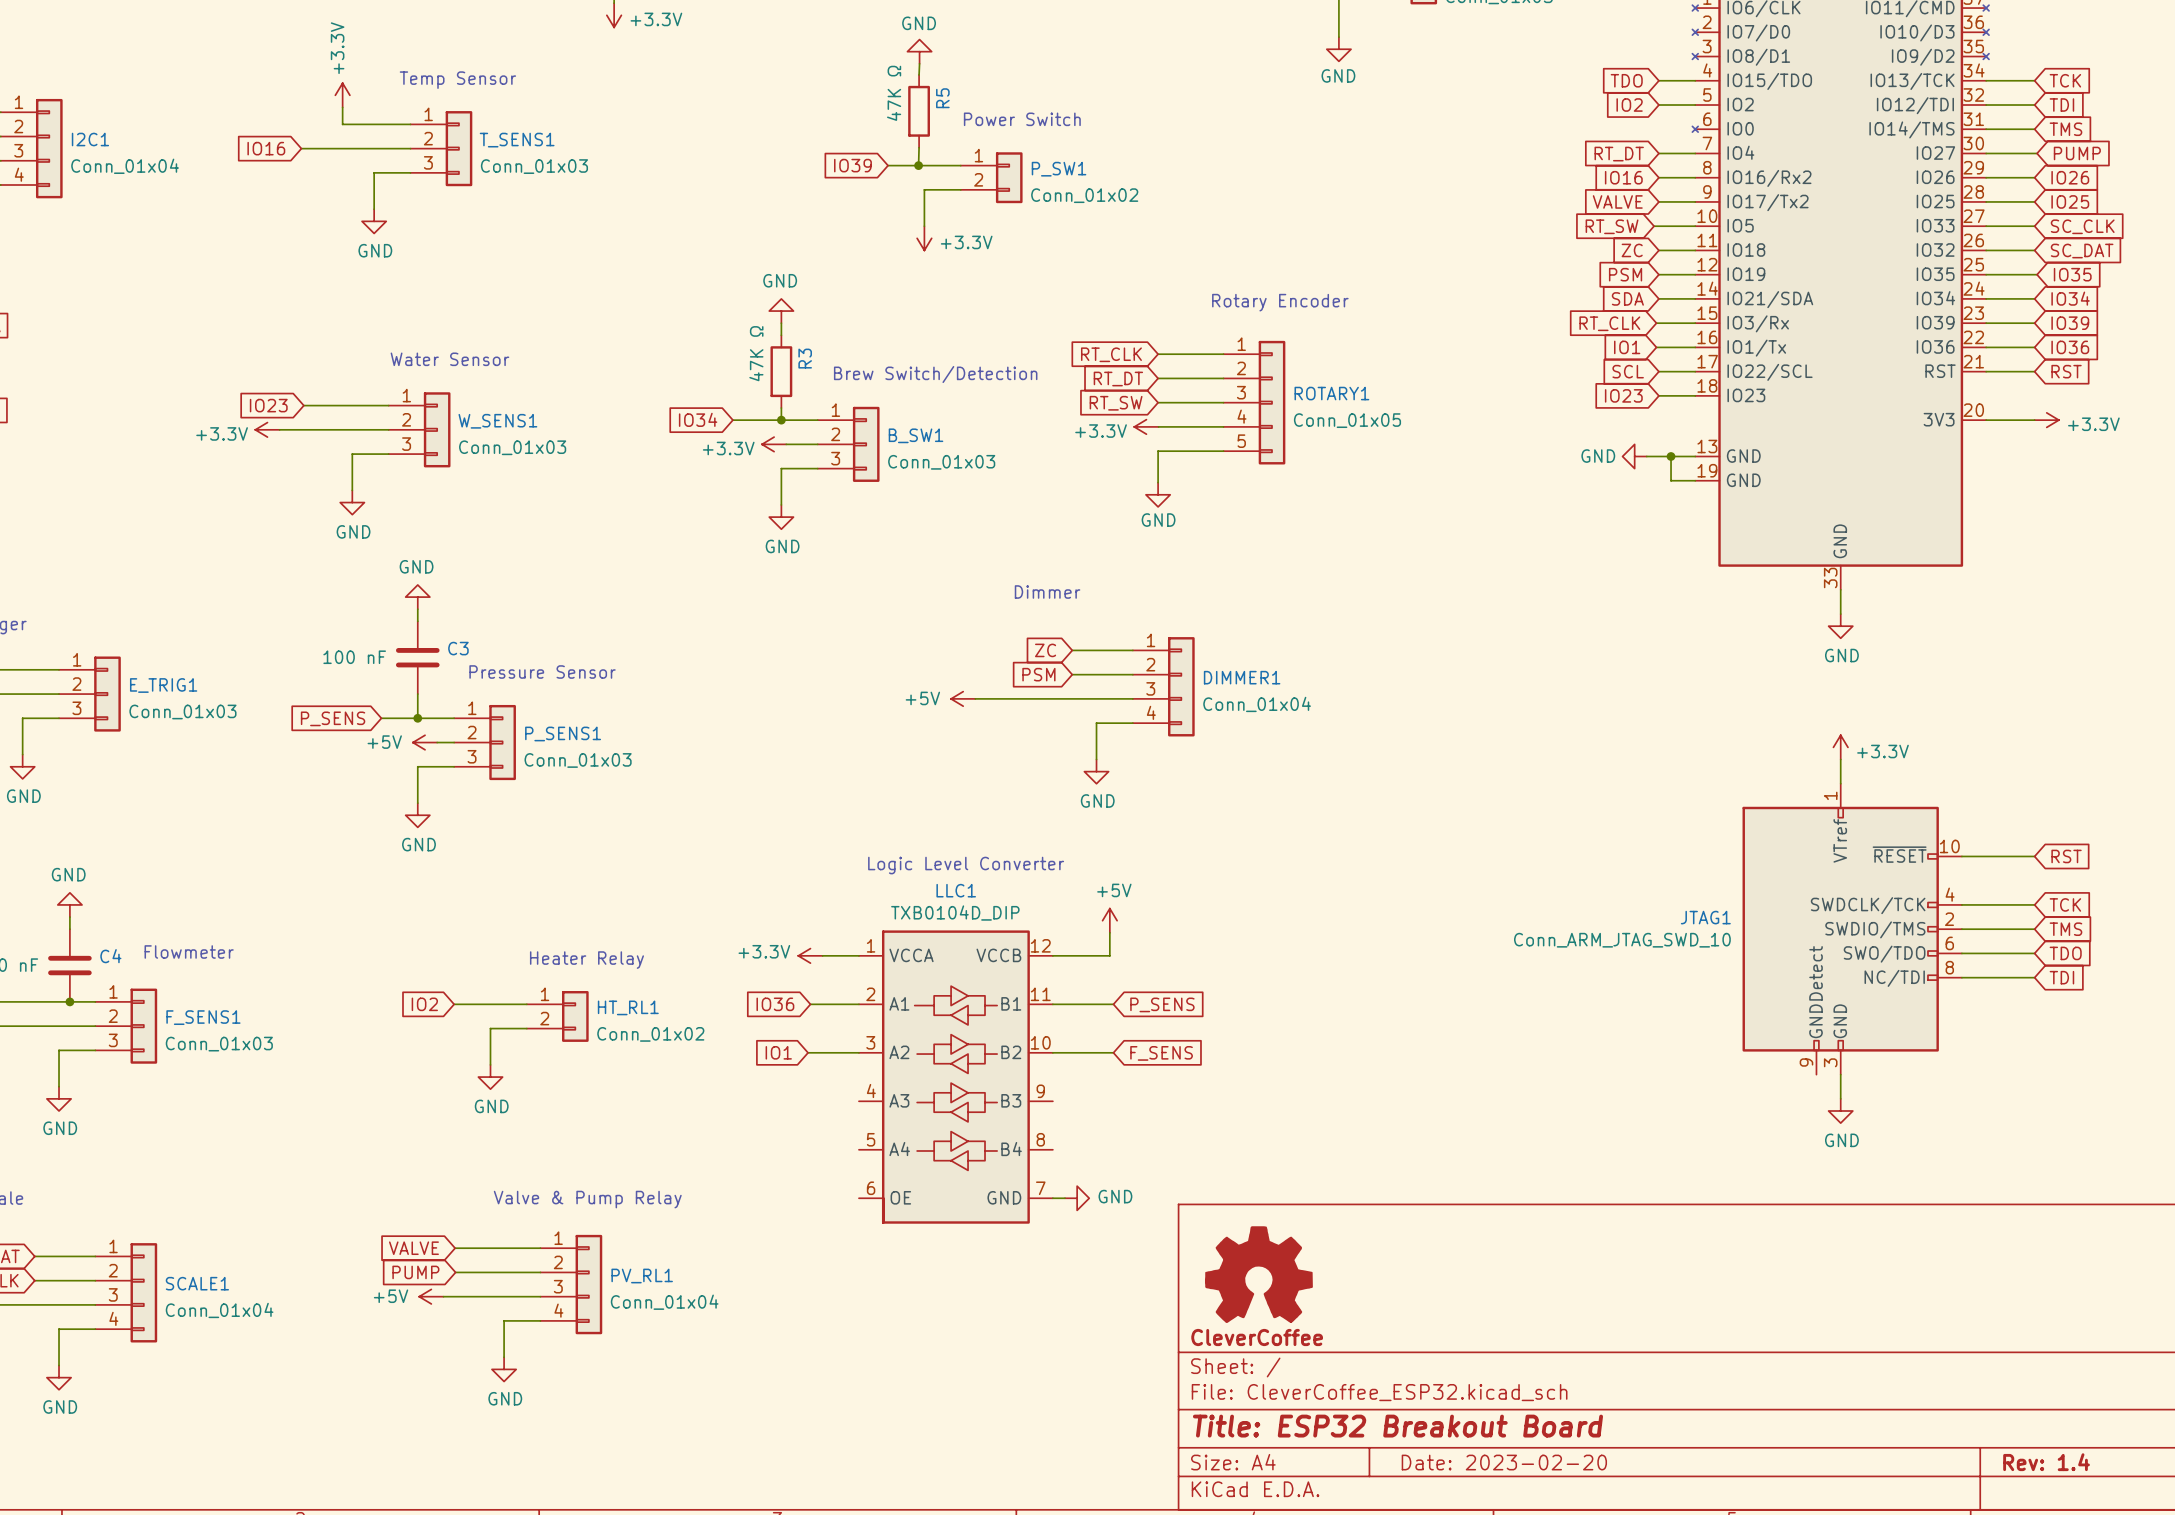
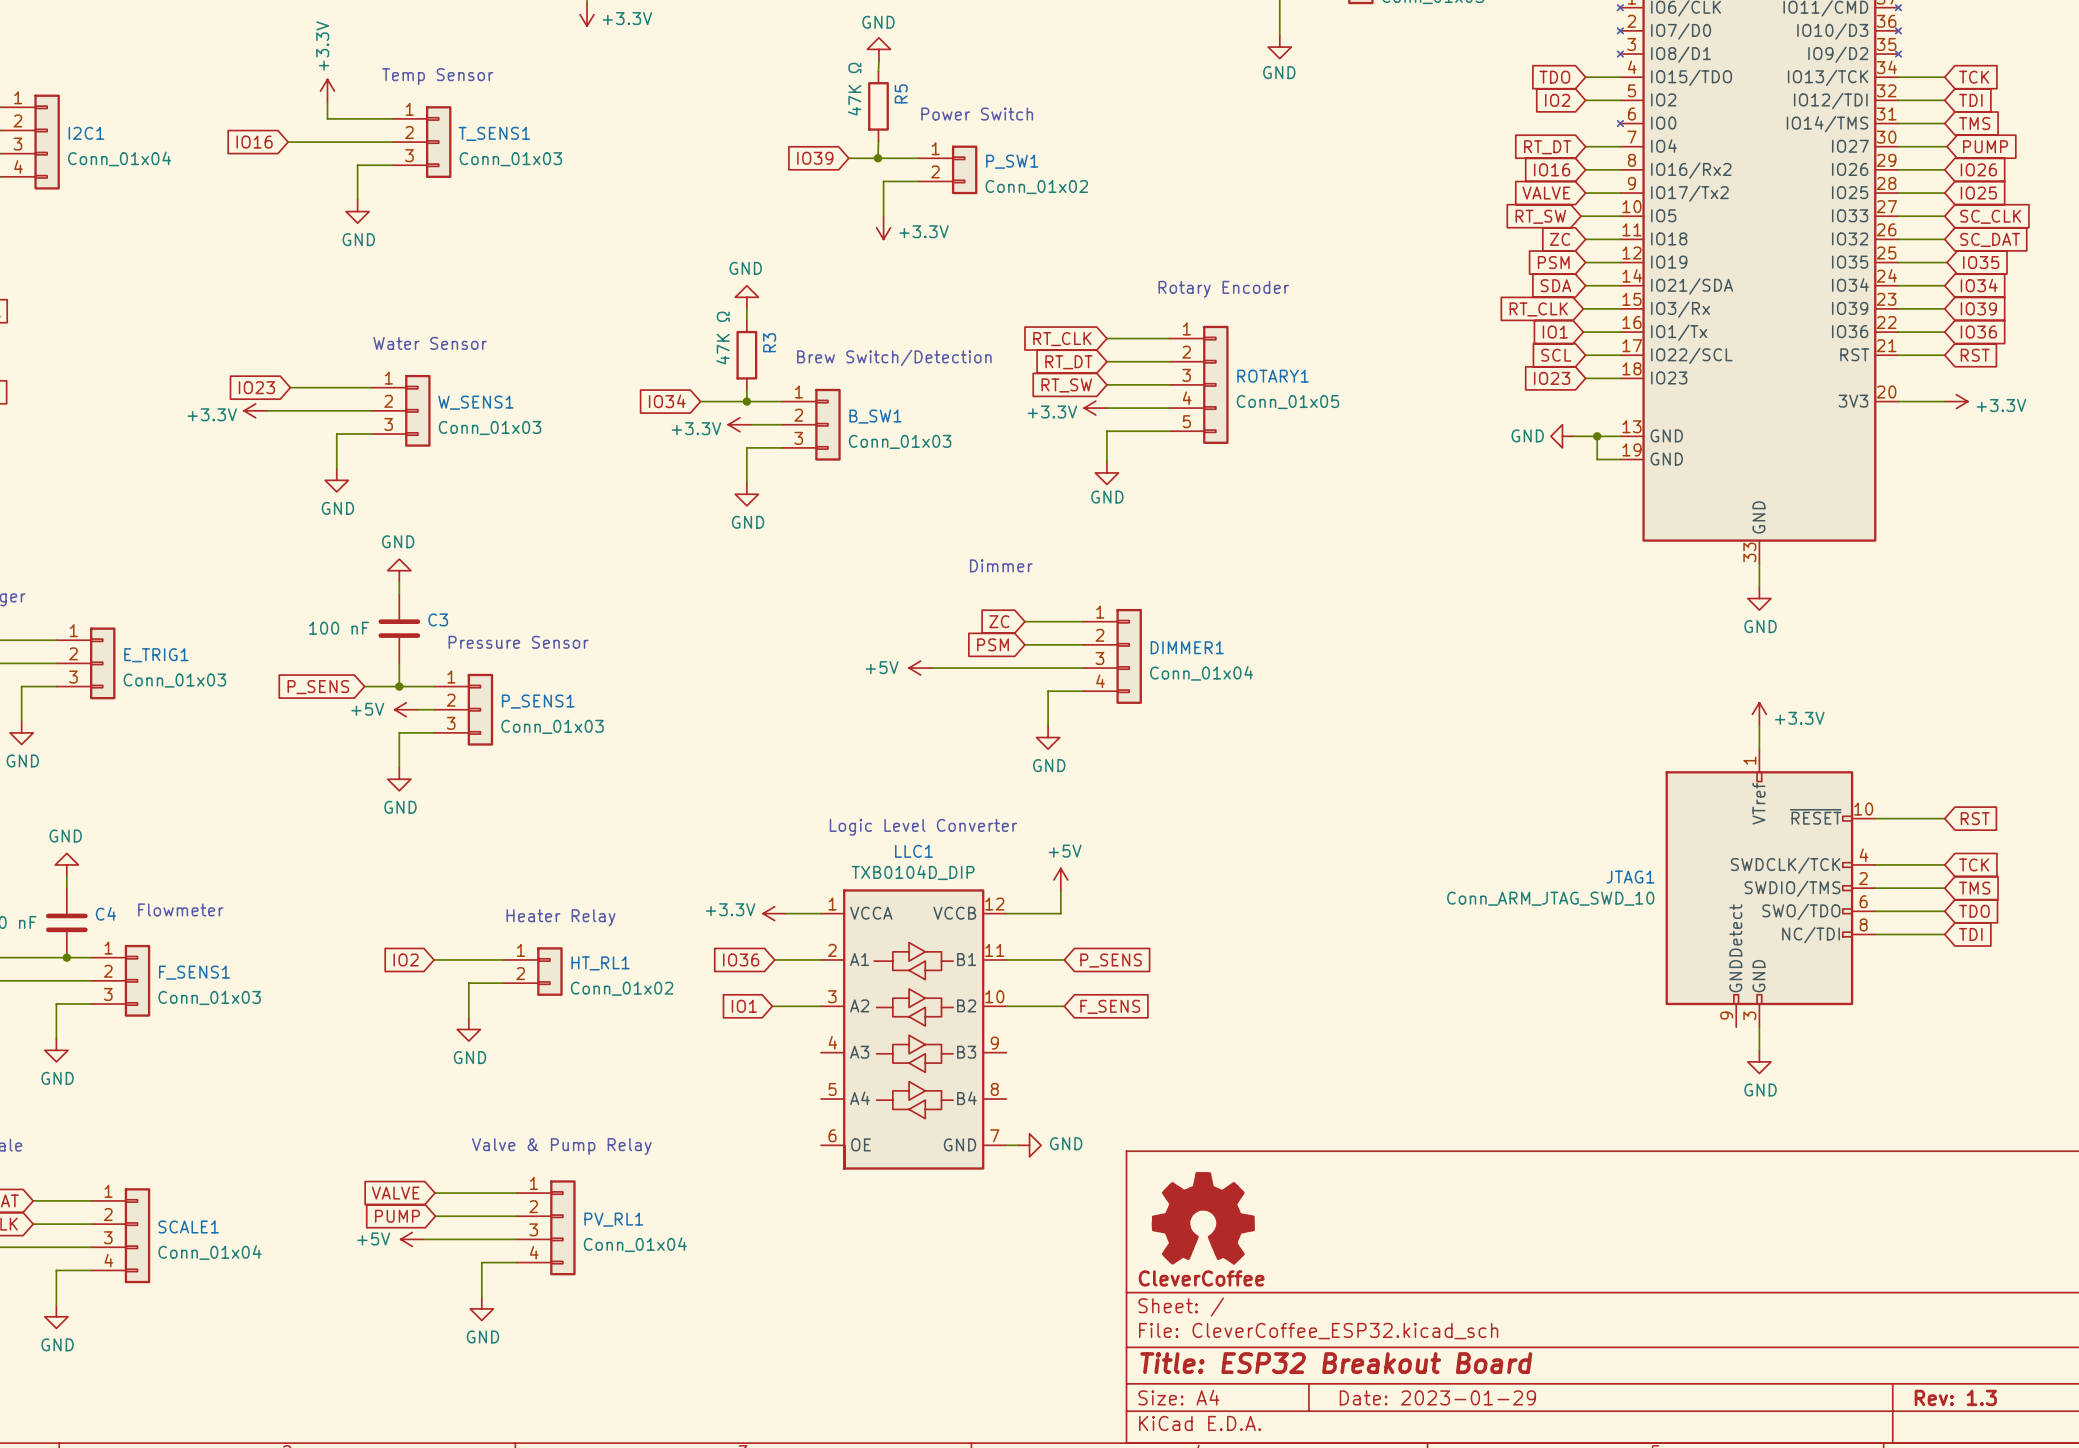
title block: Date: 2023-02-20 (1504, 1462) -> Date: 2023-01-29 (1437, 1397)
title block: Rev: 1.4 (2046, 1462) -> Rev: 1.3 (1955, 1397)

